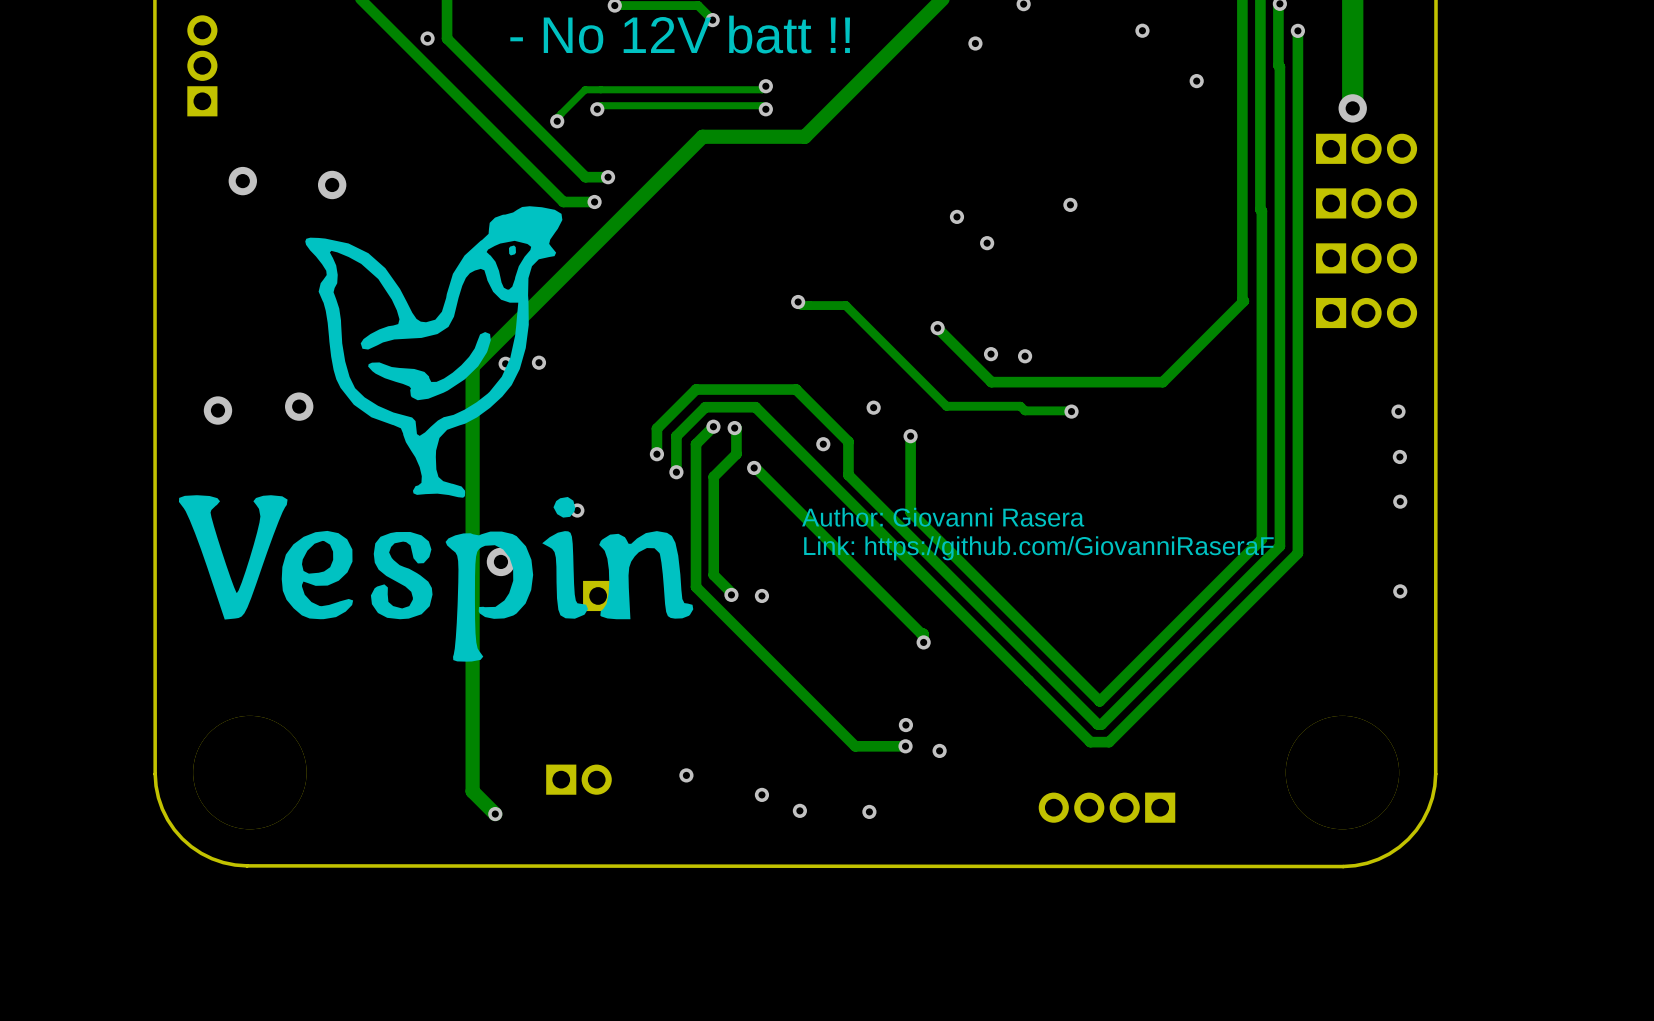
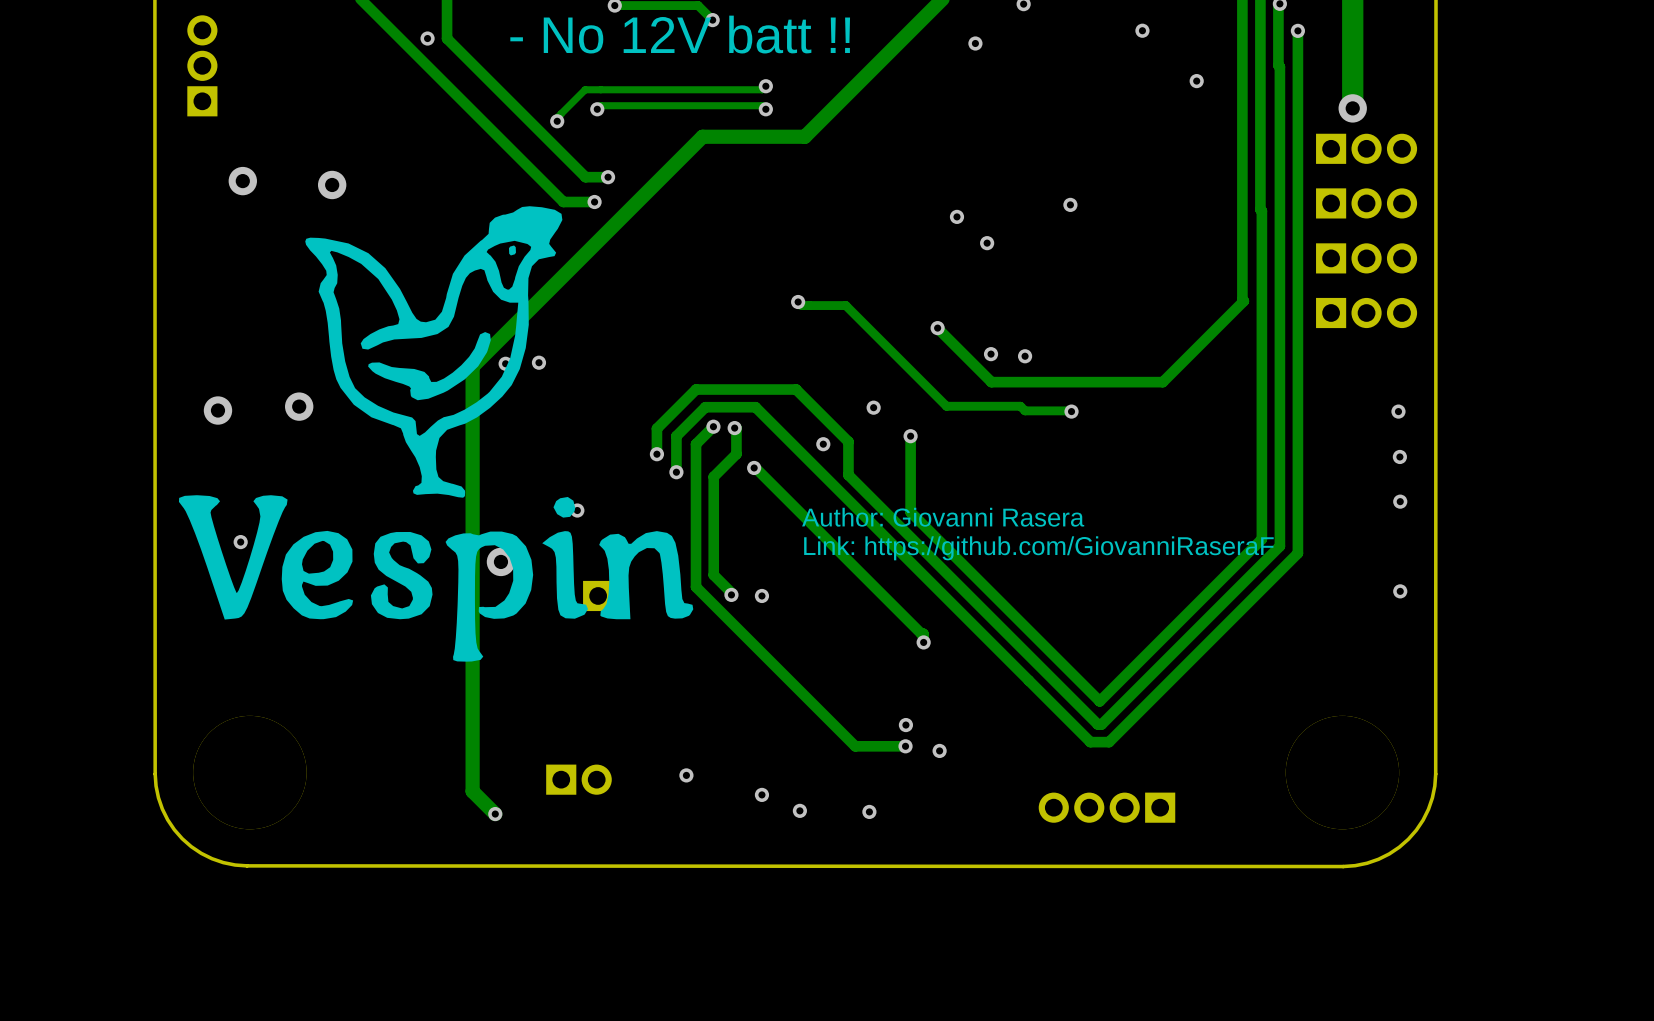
via: none -> (240, 542)

